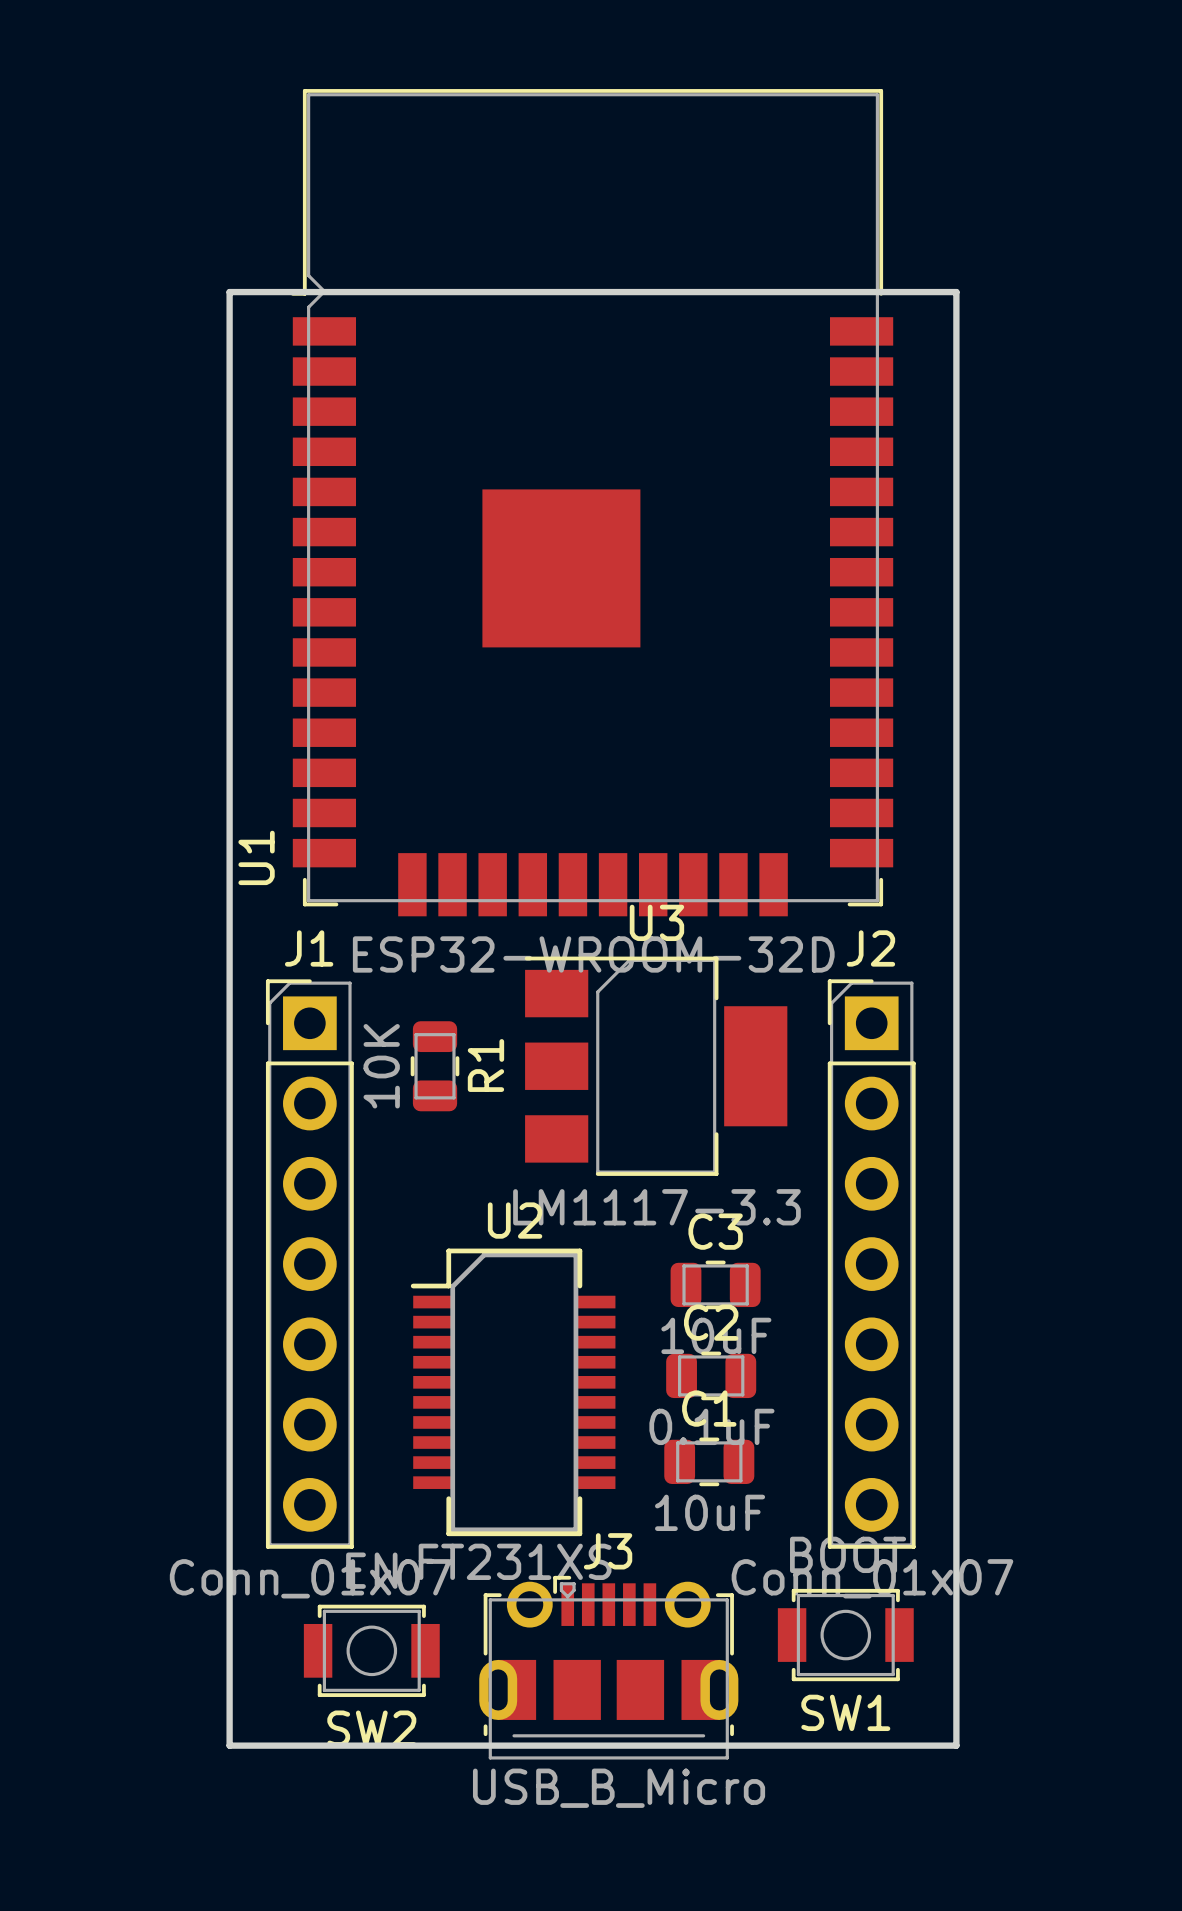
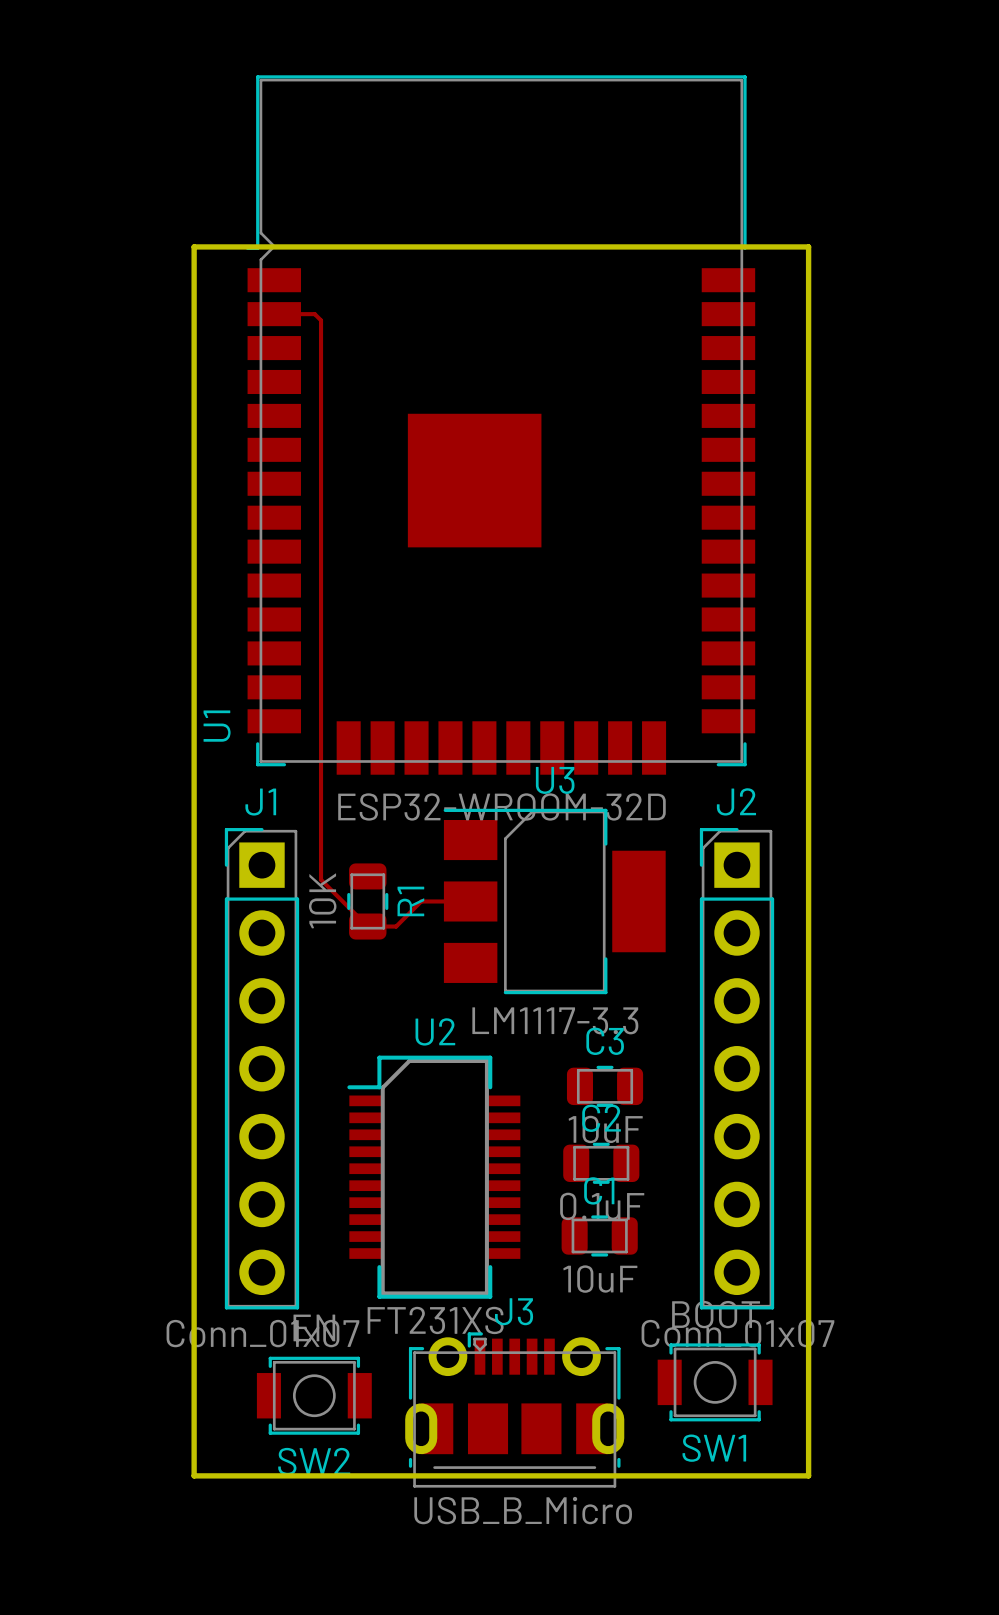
top track: none -> (274, 314) (314, 314) (321, 320) (321, 879) (367, 926) (396, 926) (421, 901) (470, 901)

